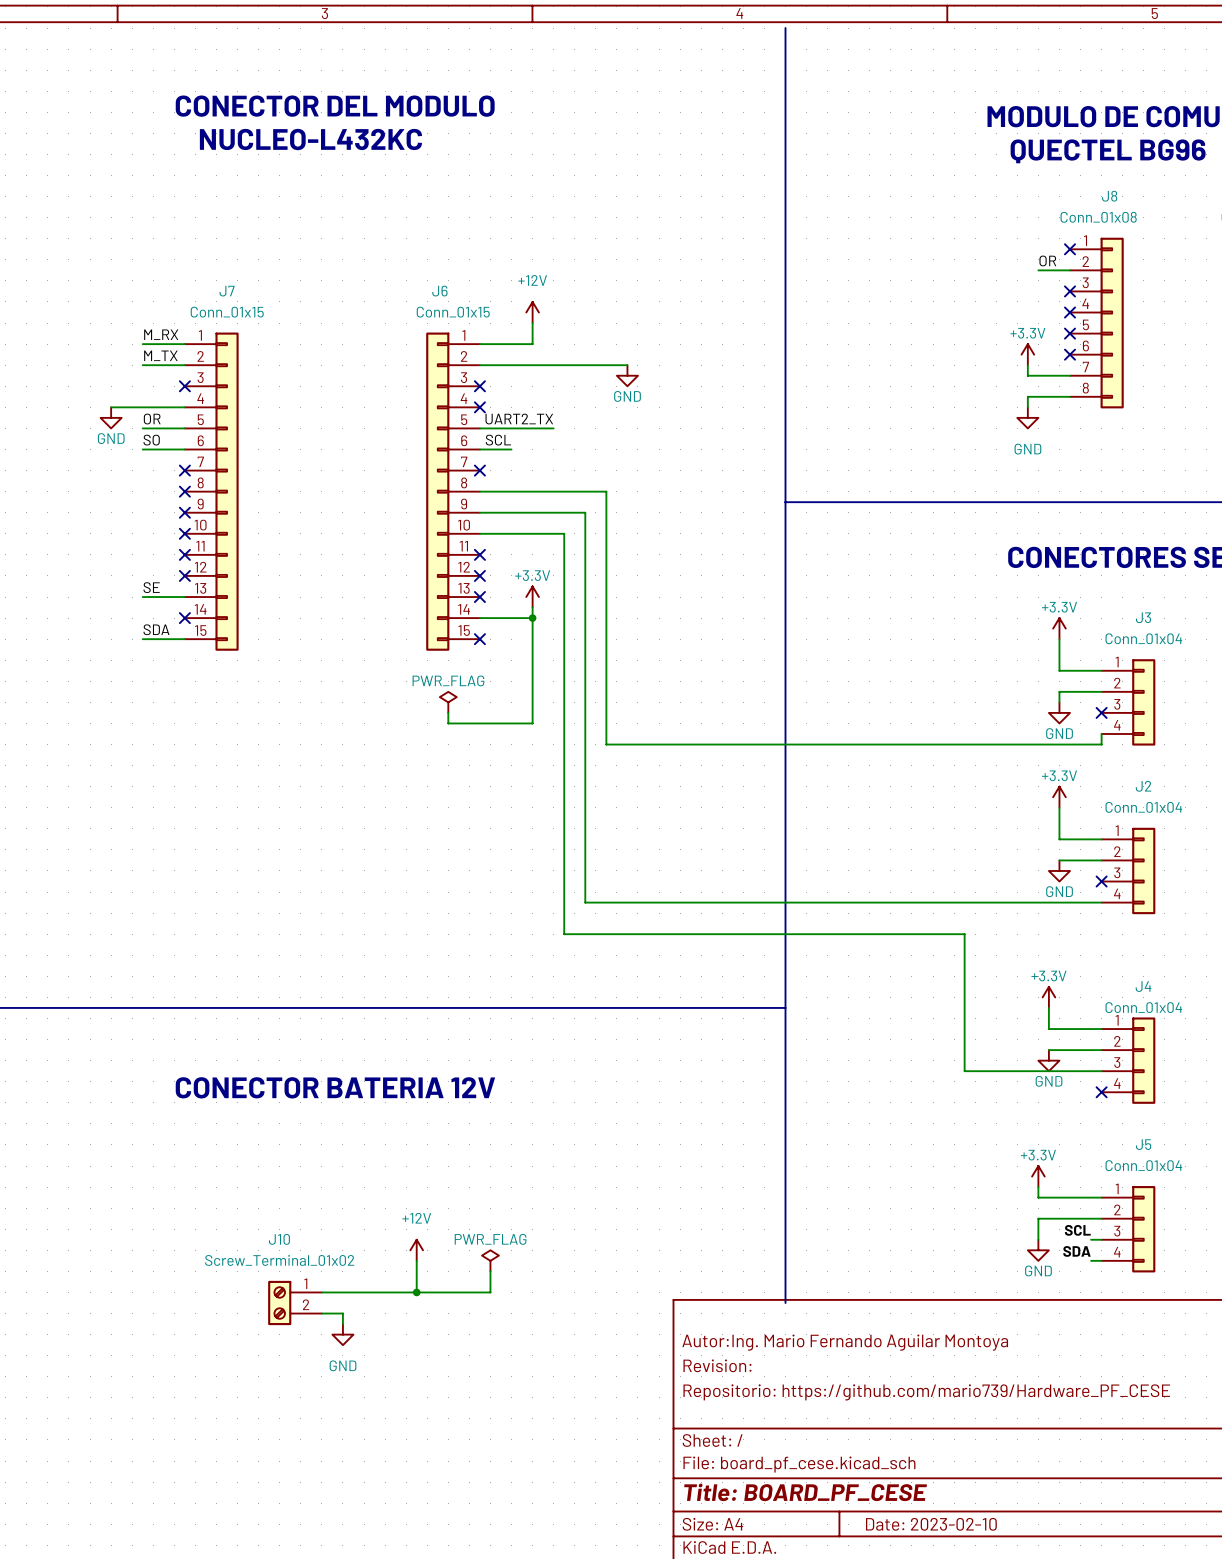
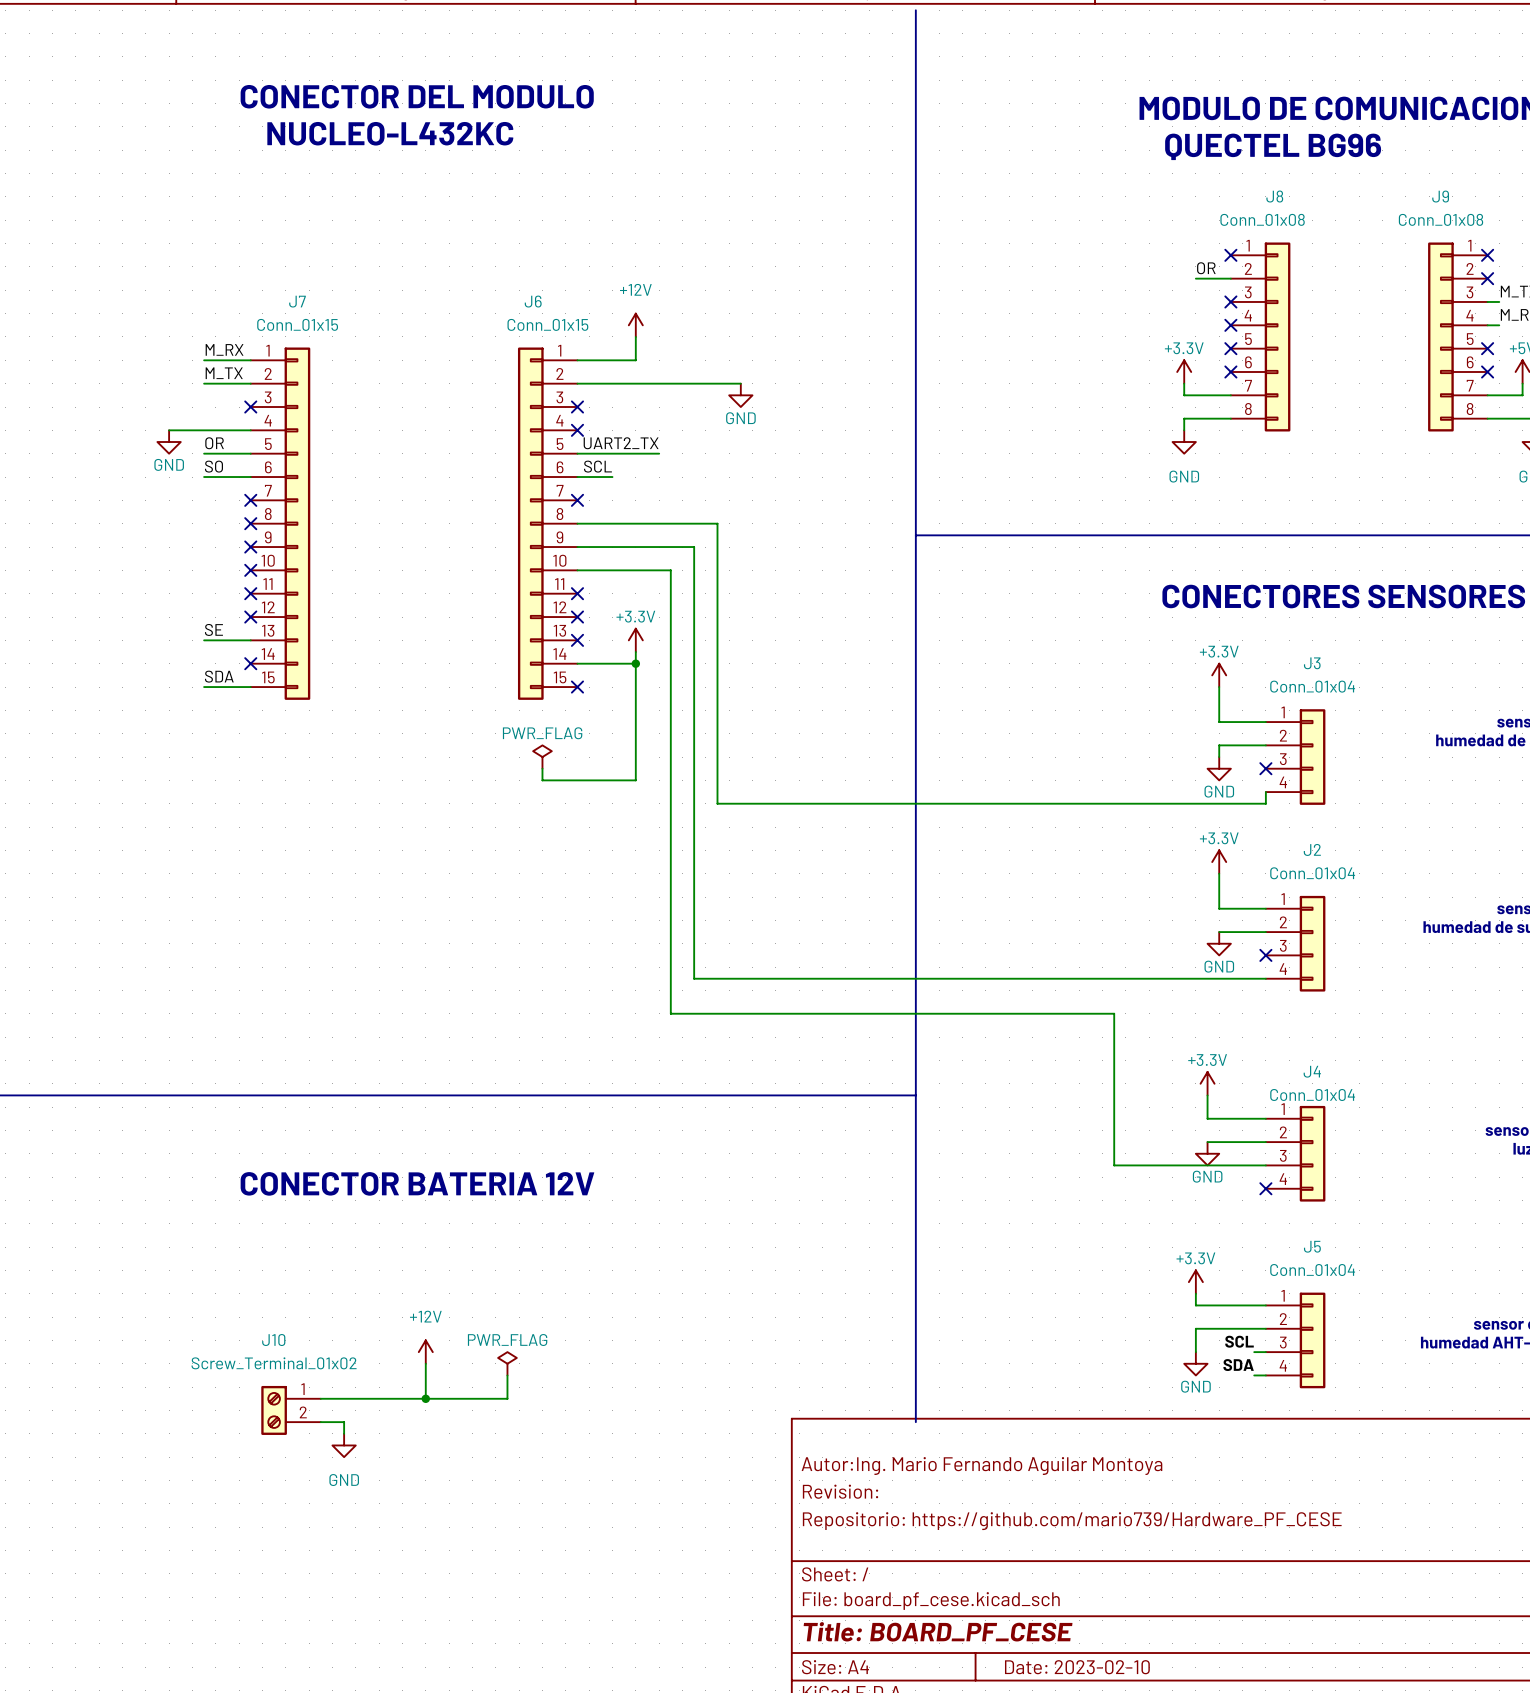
power symbol: none -> +12V (425, 1352)
wire: none -> (425, 1363) (425, 1398)
power symbol: +12V (416, 1250) -> PWR_FLAG (507, 1363)
power symbol: PWR_FLAG (490, 1260) -> none
wire: (490, 1271) (490, 1292) (321, 1292) -> none
junction: none -> (425, 1398)
wire: (416, 1281) (416, 1292) -> (507, 1398) (320, 1398)
junction: (416, 1292) -> none
J10 position: (295, 1303) -> (291, 1410)
wire: (321, 1313) (342, 1313) (342, 1324) -> (320, 1422) (344, 1422) (344, 1433)
power symbol position: GND (342, 1334) -> GND (344, 1445)

